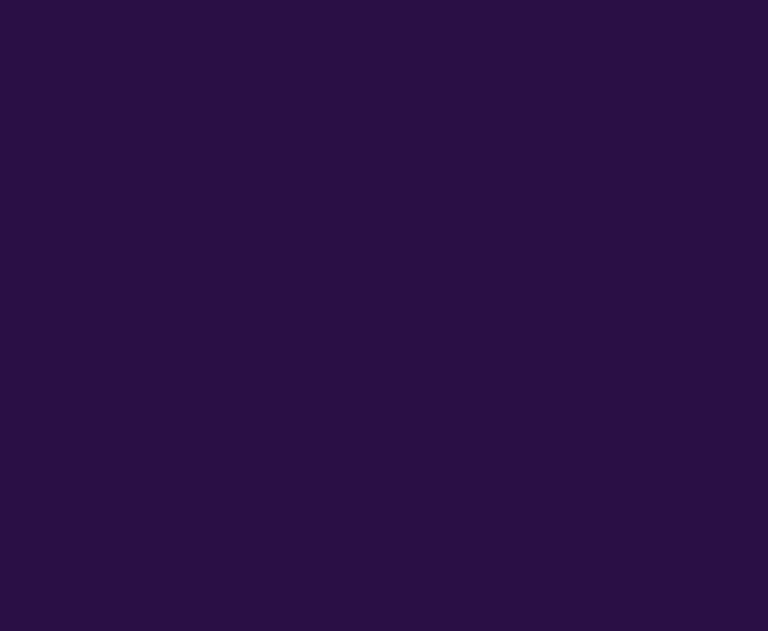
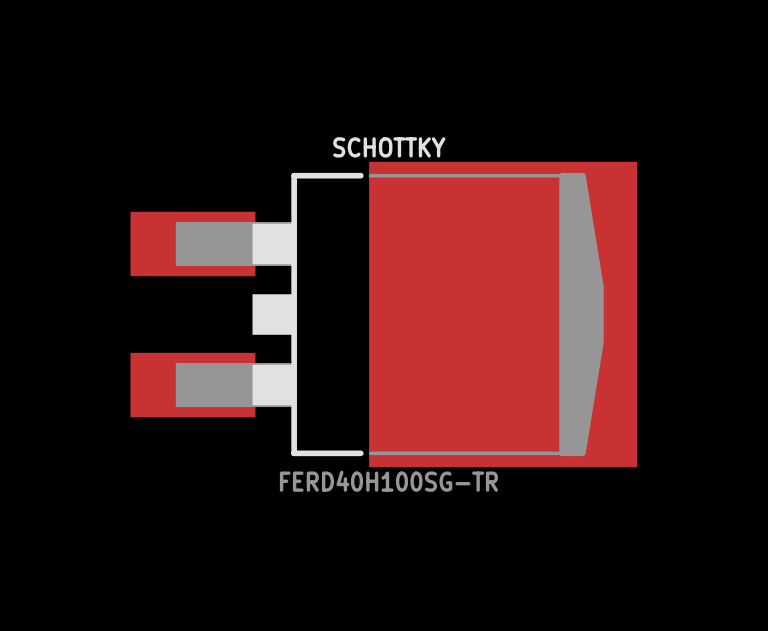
SCHOTTKY: none -> FERD40H100SG-TR (383, 314)

